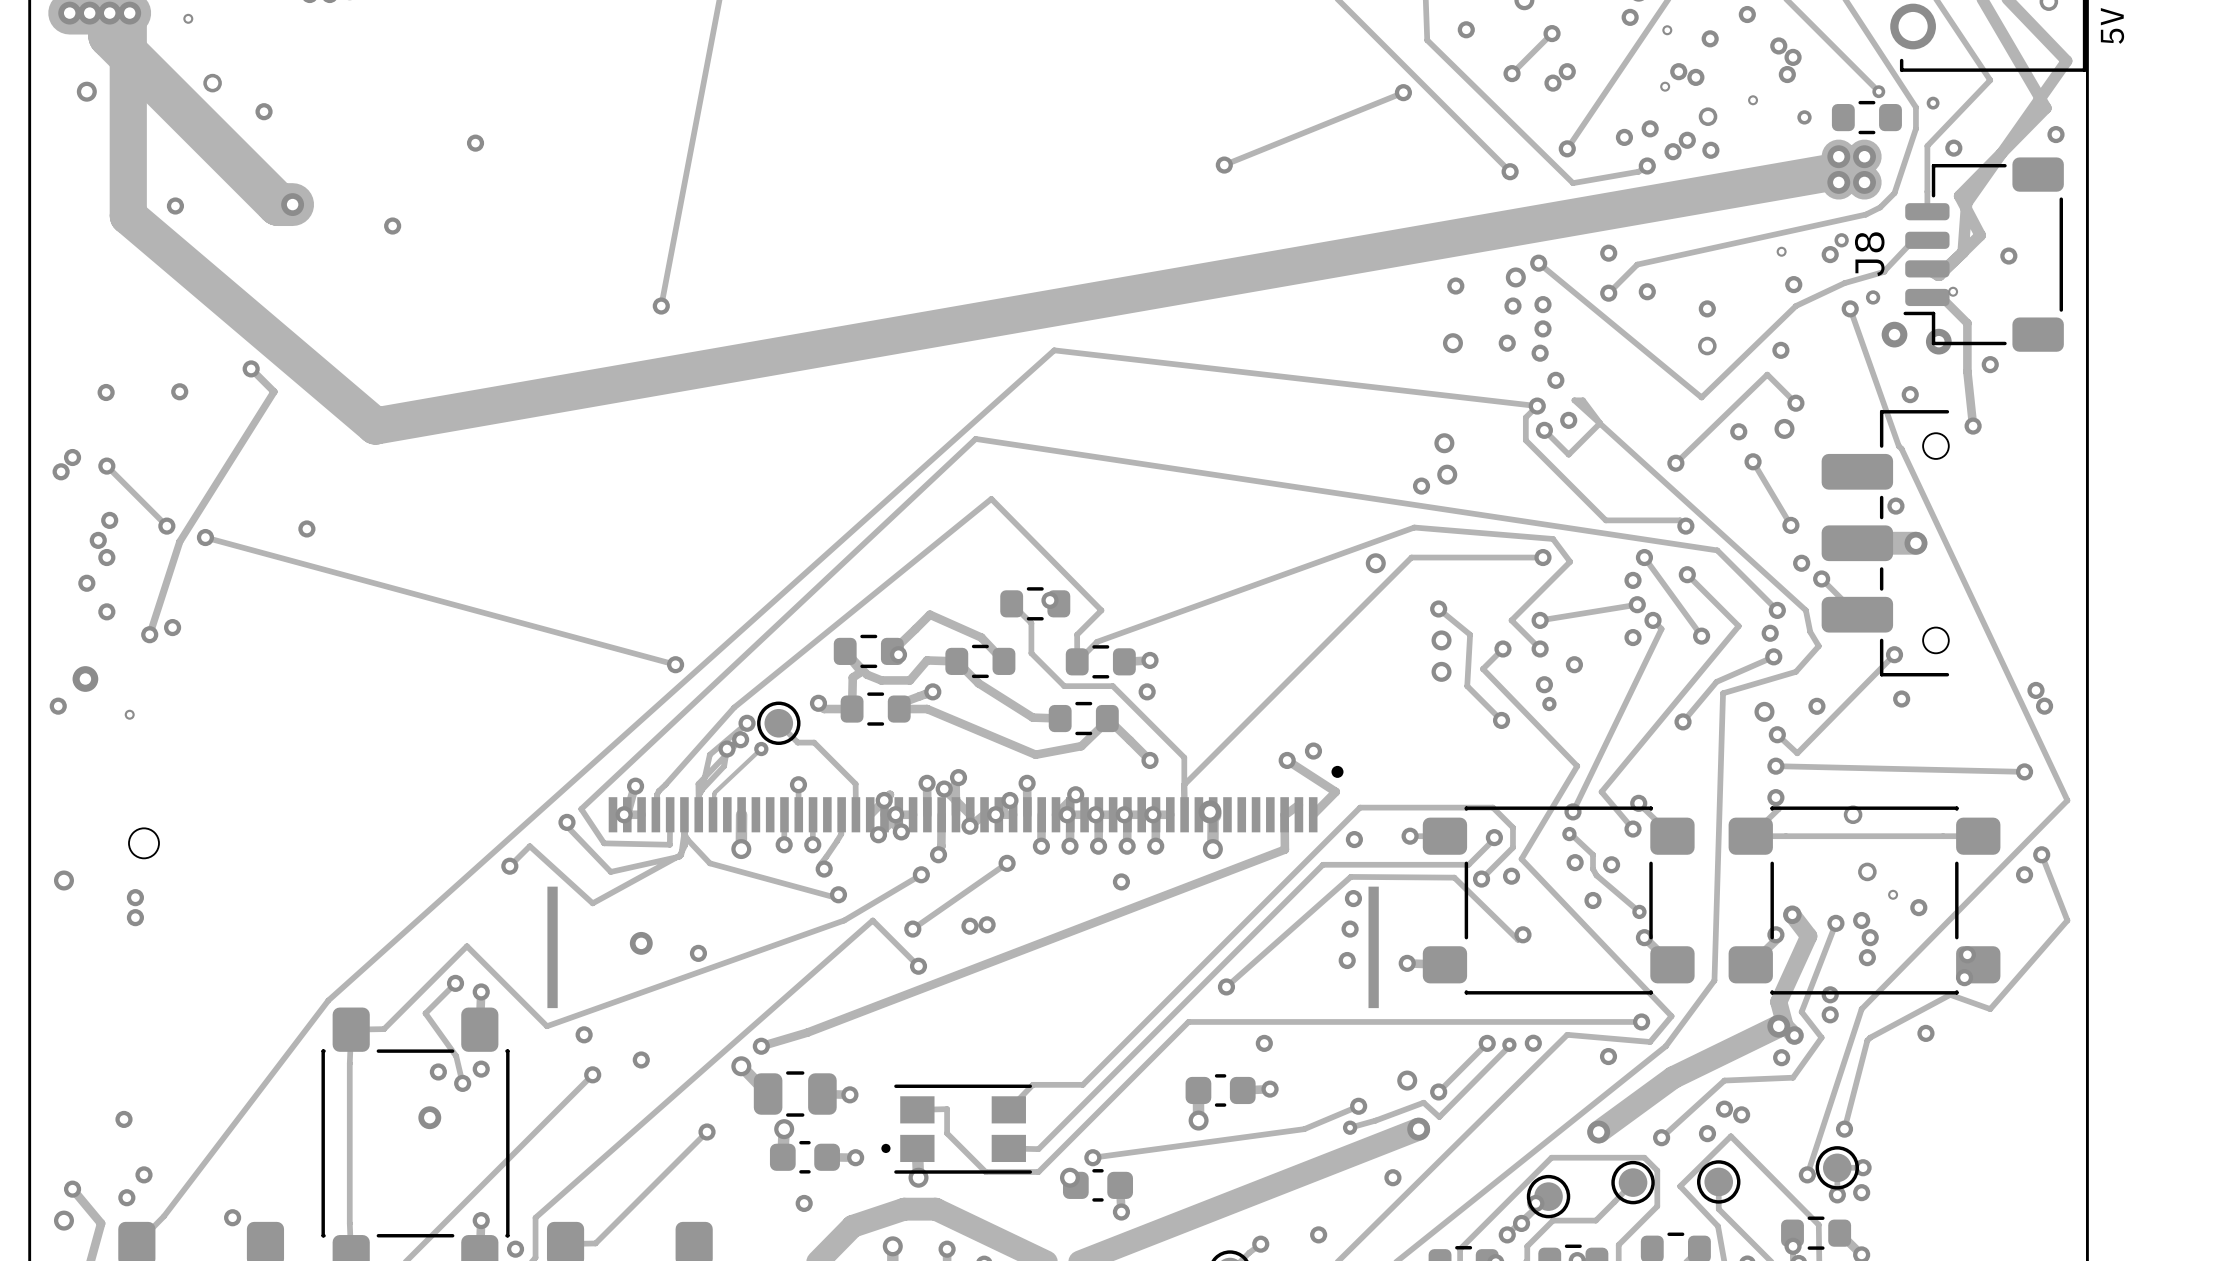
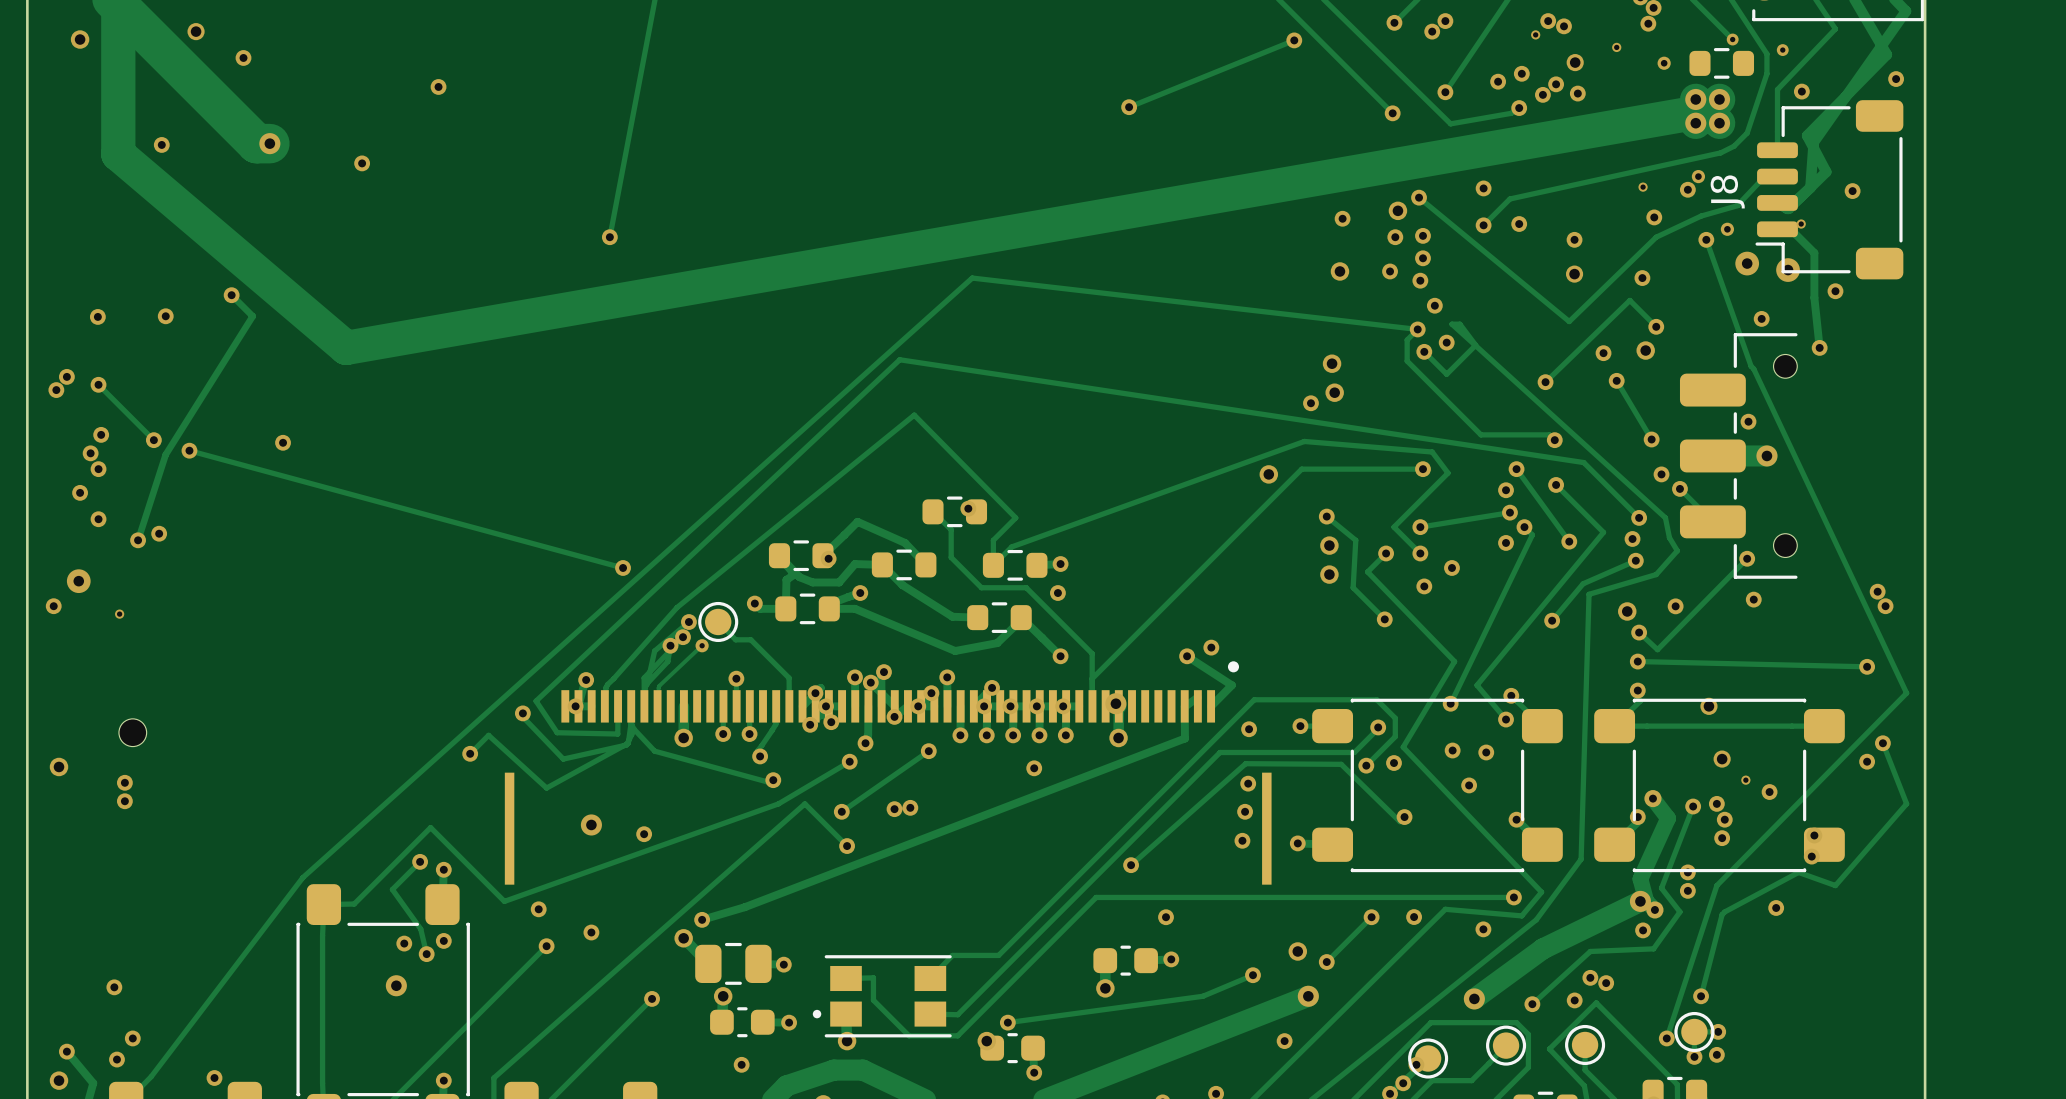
via: (1549, 704) -> none
track: (1569, 834) (1593, 854) (1593, 869) (1596, 875) (1639, 911) -> none
via: (1569, 834) -> none
via: (1639, 911) -> none
track: (1509, 1044) (1439, 1116) (1423, 1102) (1375, 1120) (1350, 1127) -> none
via: (1509, 1044) -> none
via: (1350, 1127) -> none

